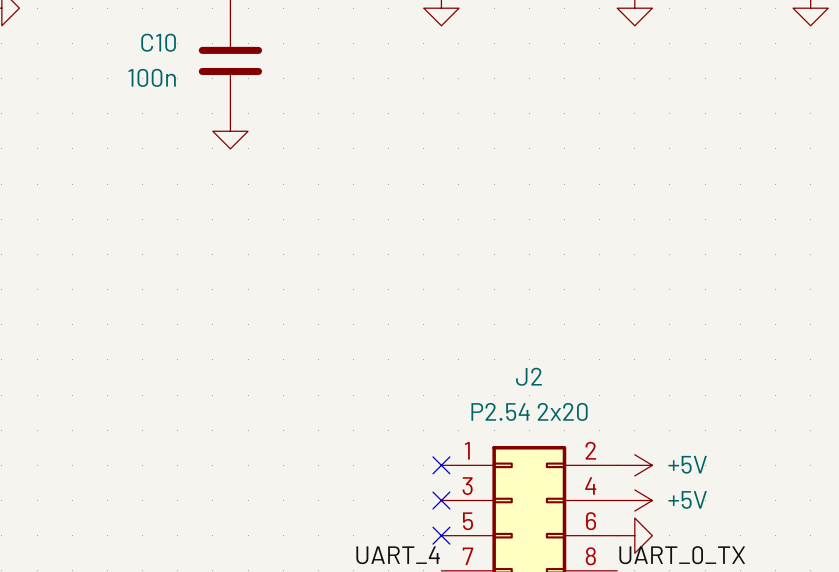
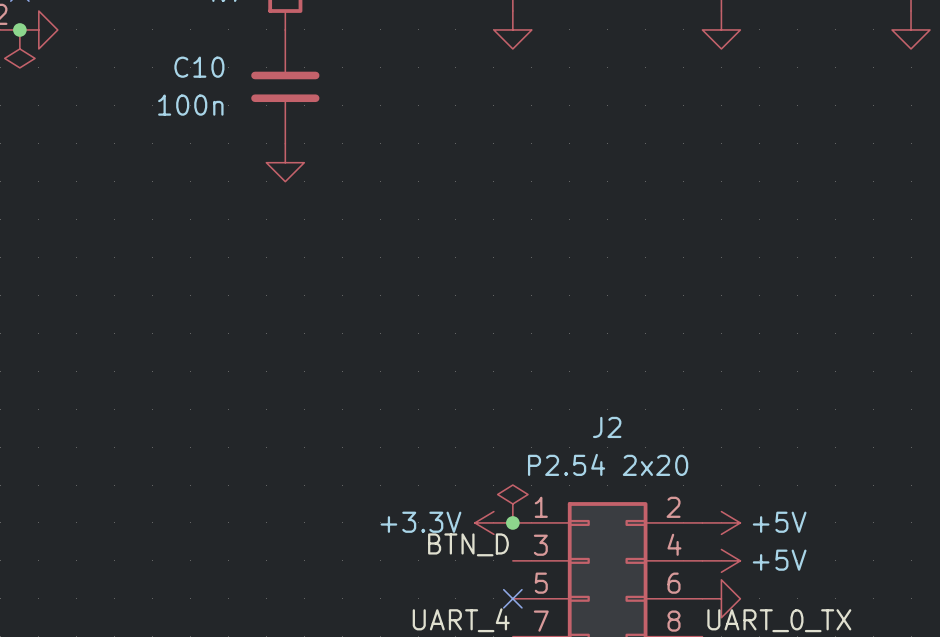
power symbol: none -> (512, 503)
power symbol: none -> +3.3V (493, 522)
no-connect mark: (441, 465) -> none
junction: none -> (512, 522)
label: none -> BTN_D (468, 544)
no-connect mark: (441, 500) -> none

